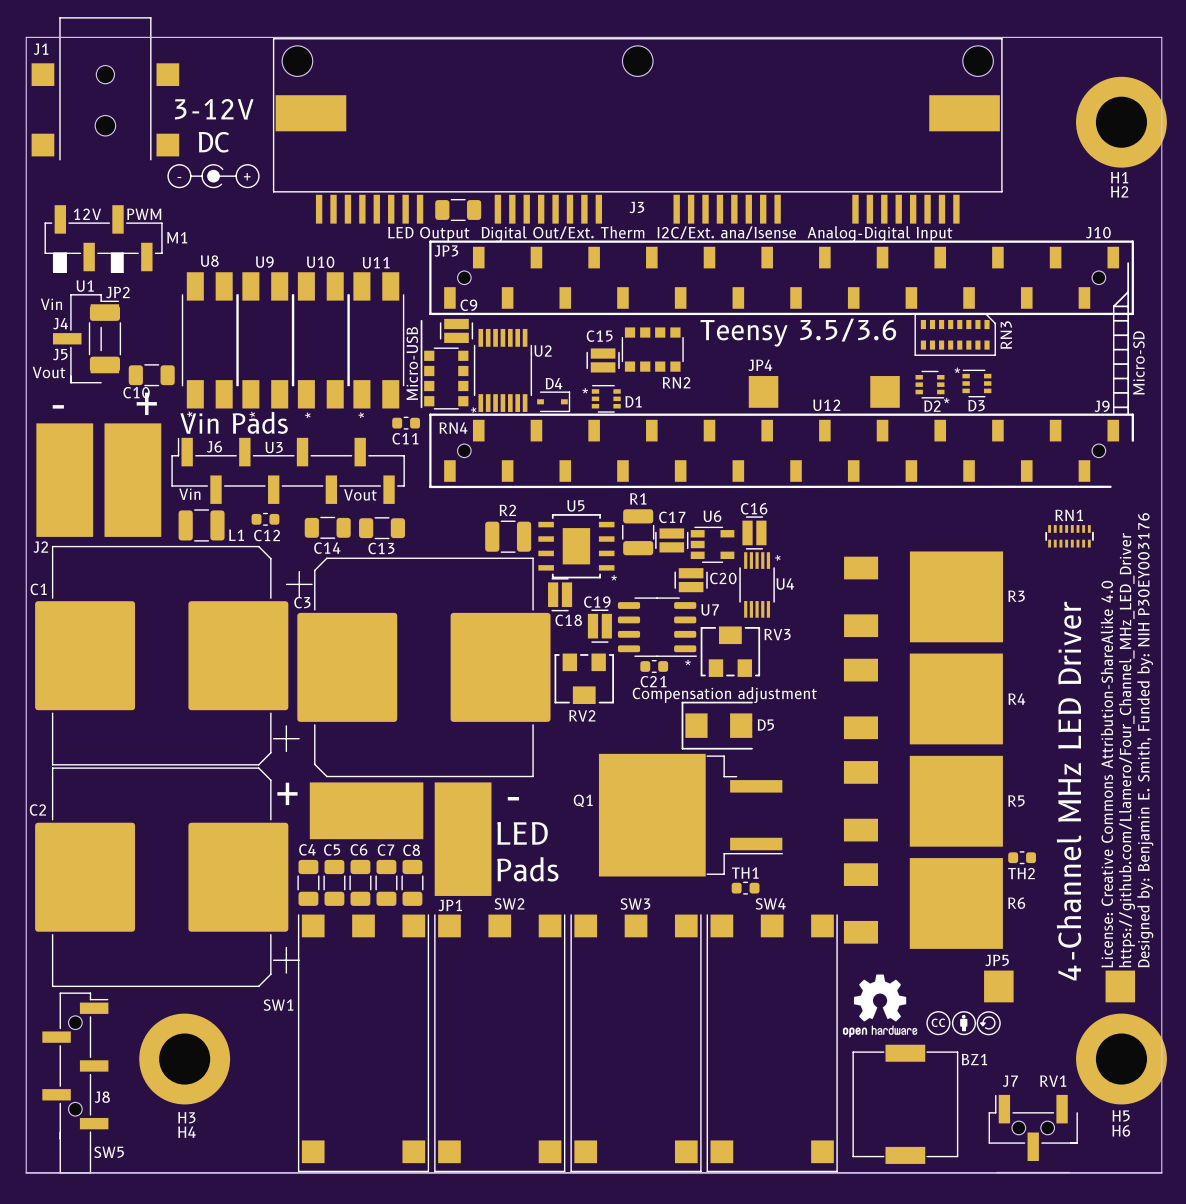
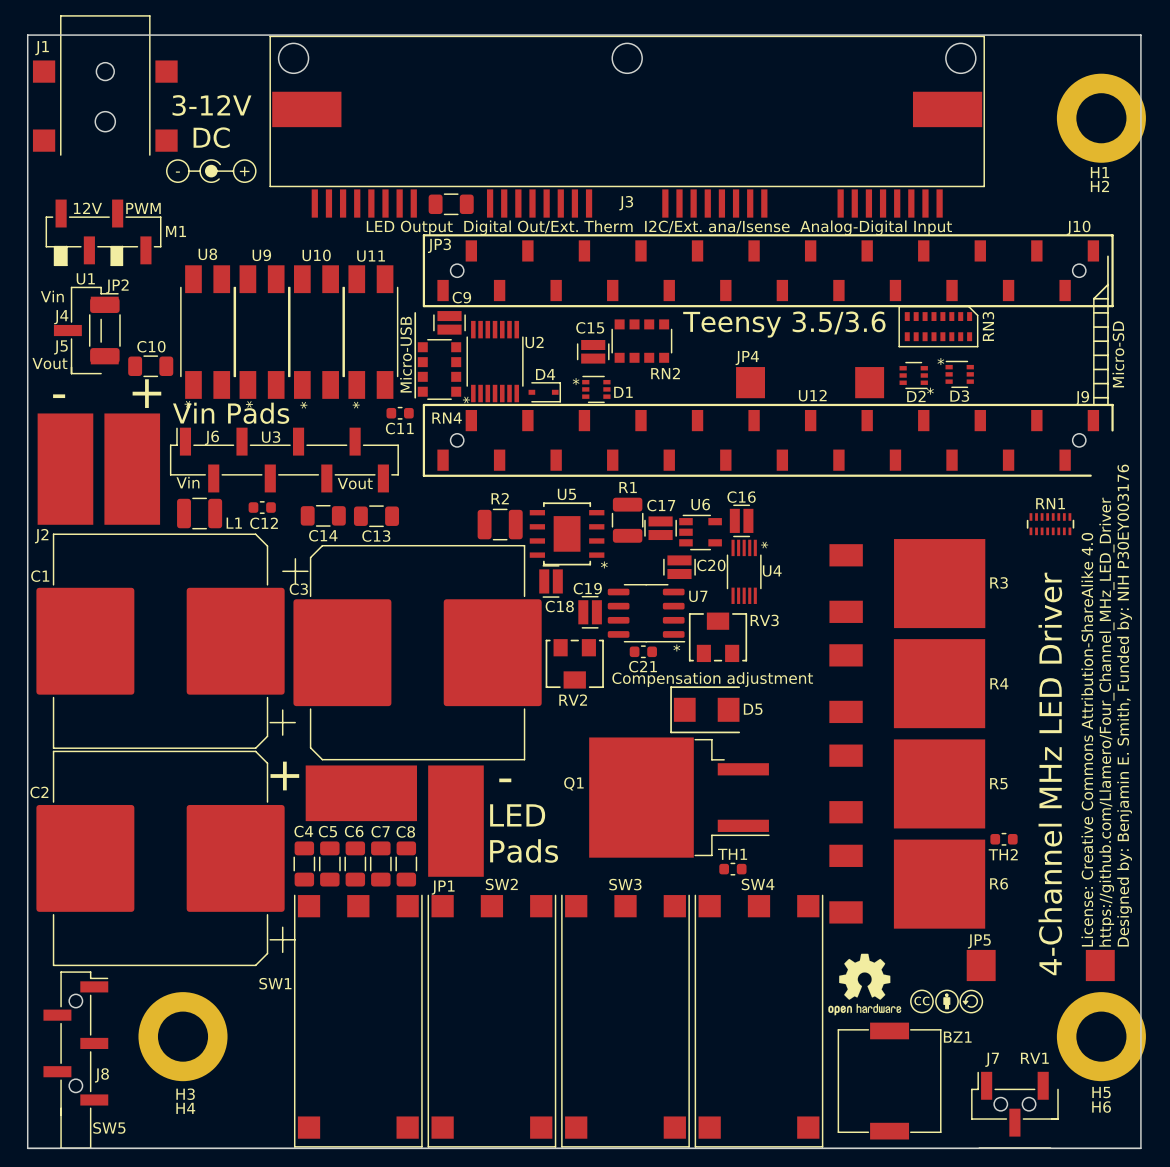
C10 name position: C10 (136, 392) -> C10 (151, 346)

